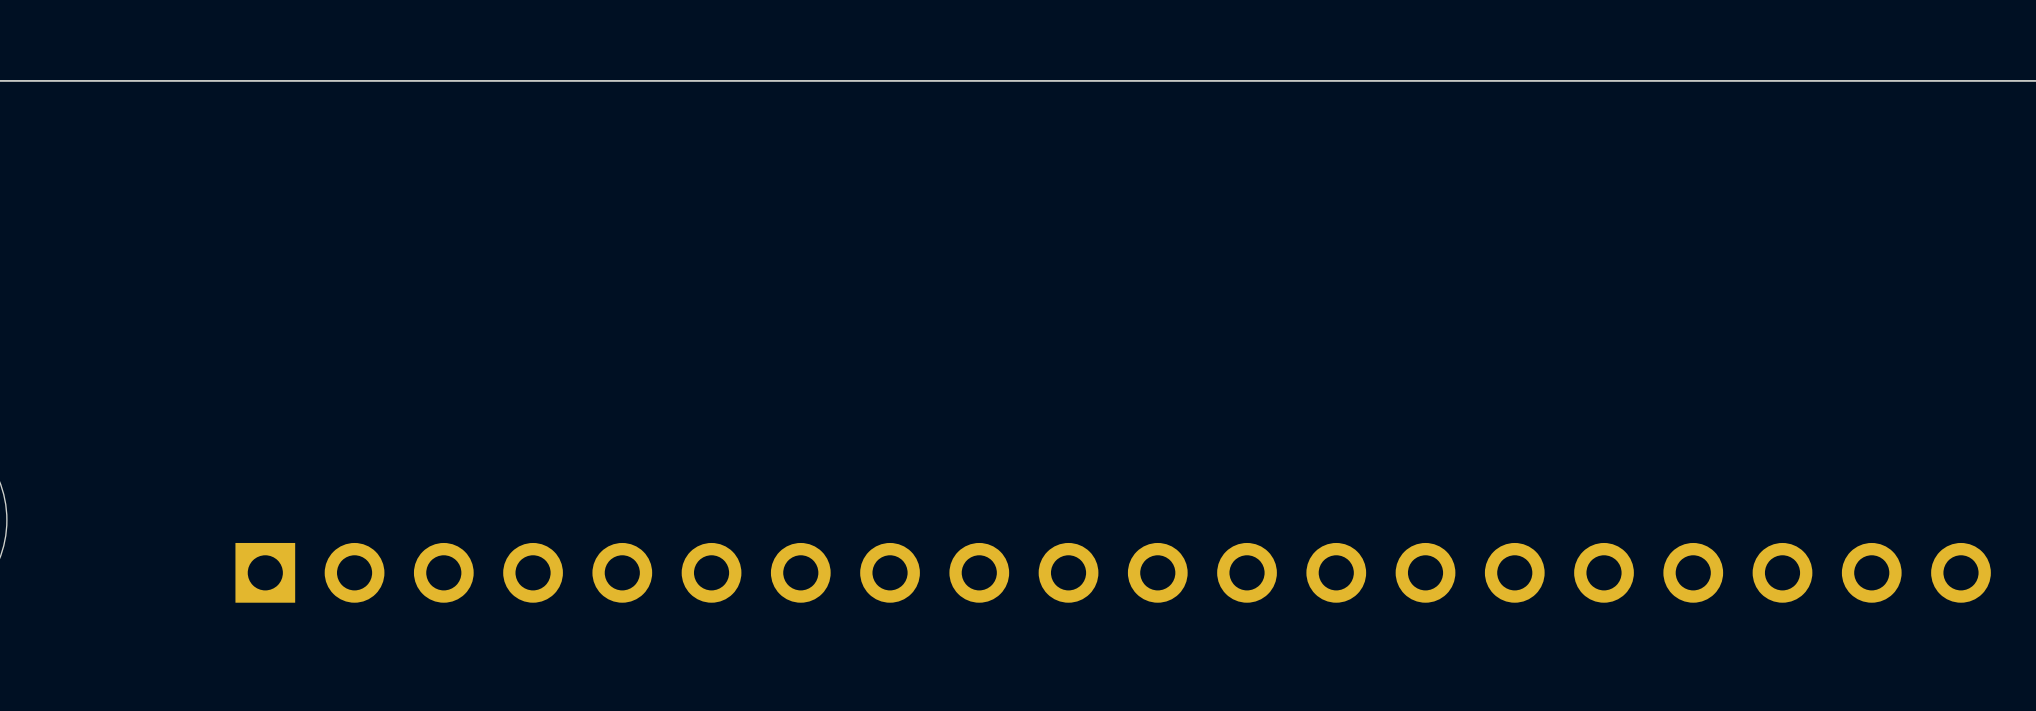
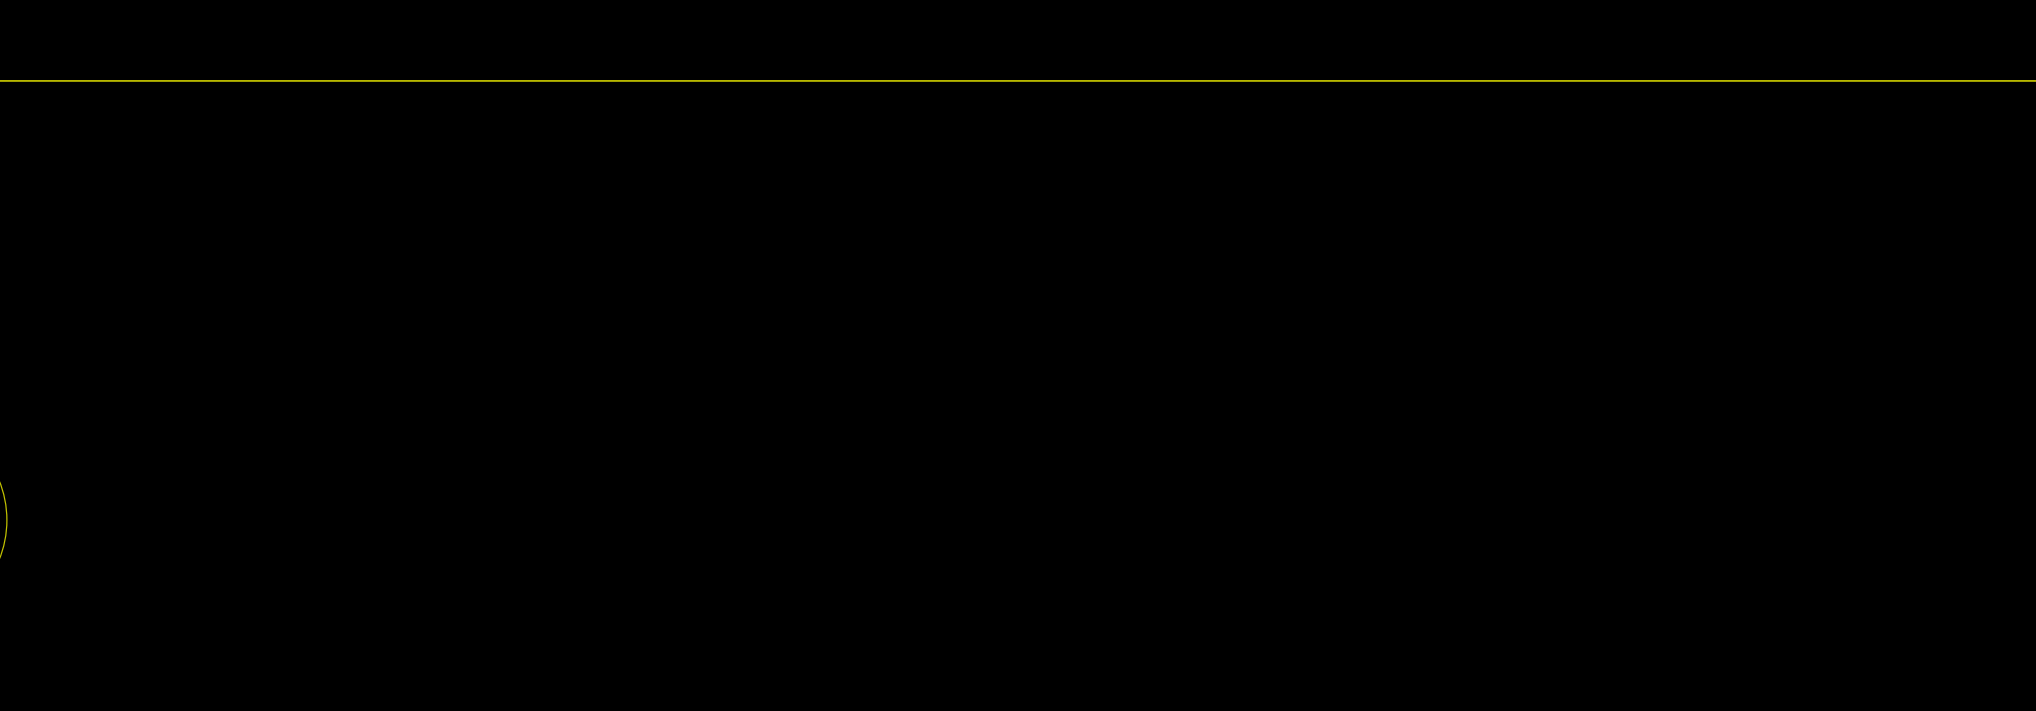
part: (1113, 572) -> none

